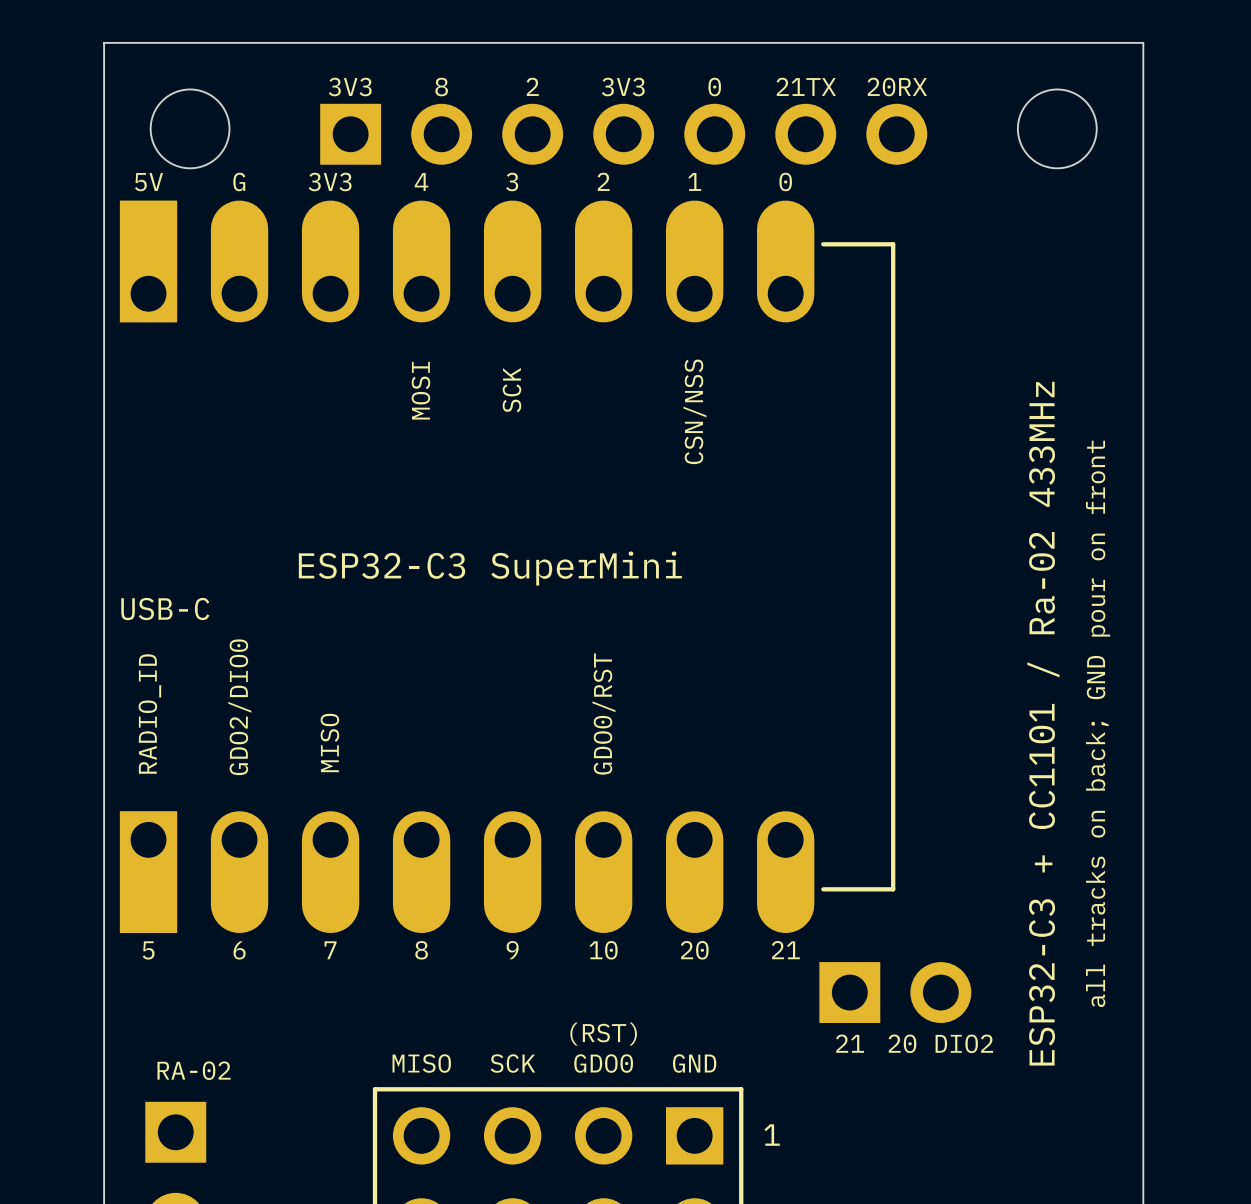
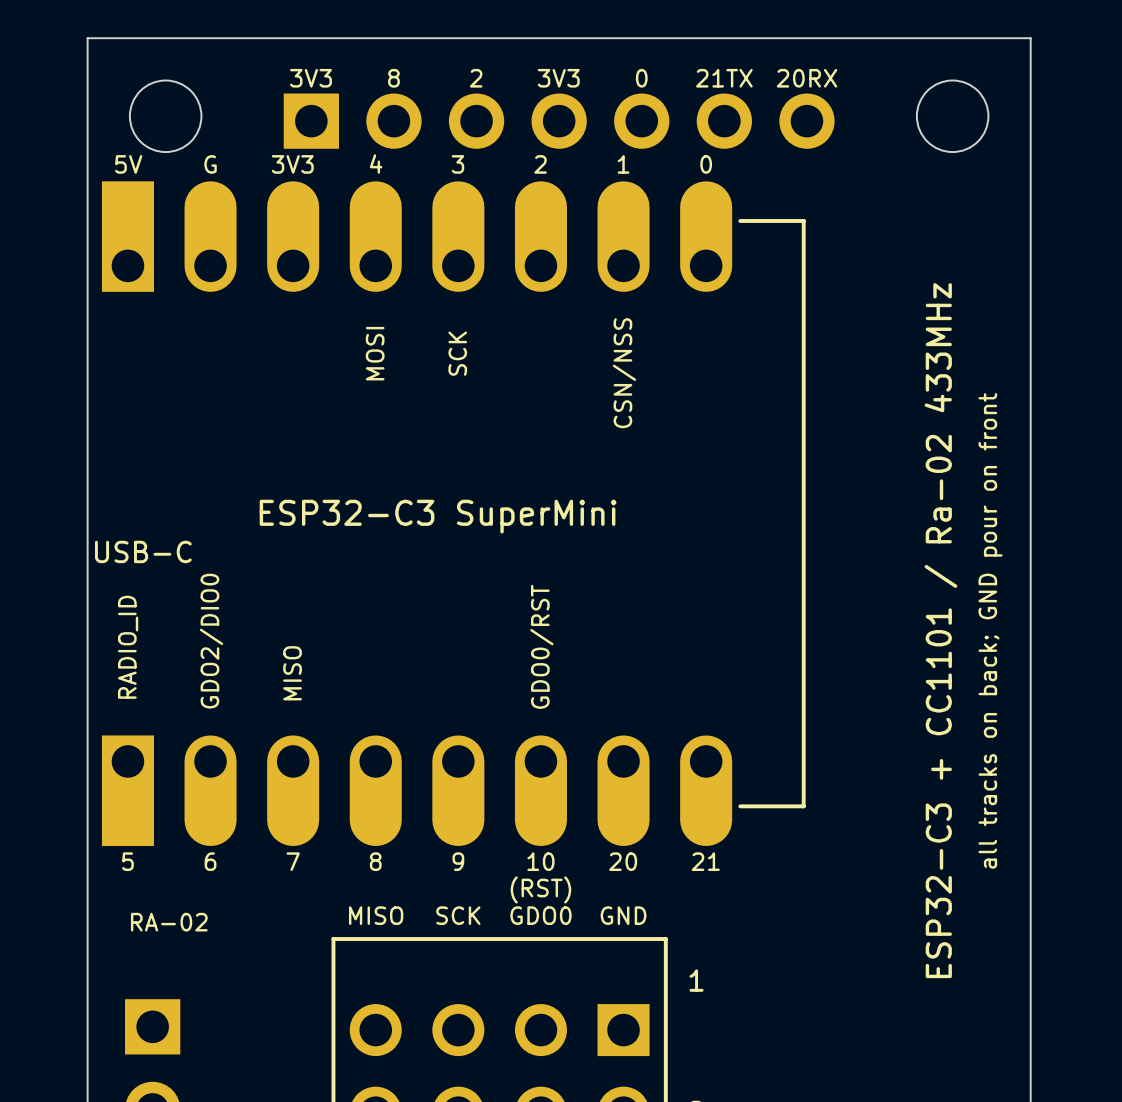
text position: ESP32-C3 + CC1101 / Ra-02 433MHz (1043, 723) -> ESP32-C3 + CC1101 / Ra-02 433MHz (940, 630)
text position: all tracks on back; GND pour on front (1098, 723) -> all tracks on back; GND pour on front (990, 630)
part: (895, 992) -> none
text position: (RST) (603, 1034) -> (RST) (540, 889)
text: 21 (850, 1043) -> none
text: 20 DIO2 (940, 1043) -> none
text position: MISO (421, 1063) -> MISO (376, 915)
text position: SCK (512, 1063) -> SCK (458, 915)
text position: GDO0 (603, 1063) -> GDO0 (540, 915)
text position: GND (694, 1063) -> GND (623, 915)
text position: RA-02 (194, 1070) -> RA-02 (169, 922)
line: (375, 1089) (741, 1089) -> (333, 987) (333, 939) (665, 939) (665, 987)
text position: 1 (772, 1135) -> 1 (696, 980)

